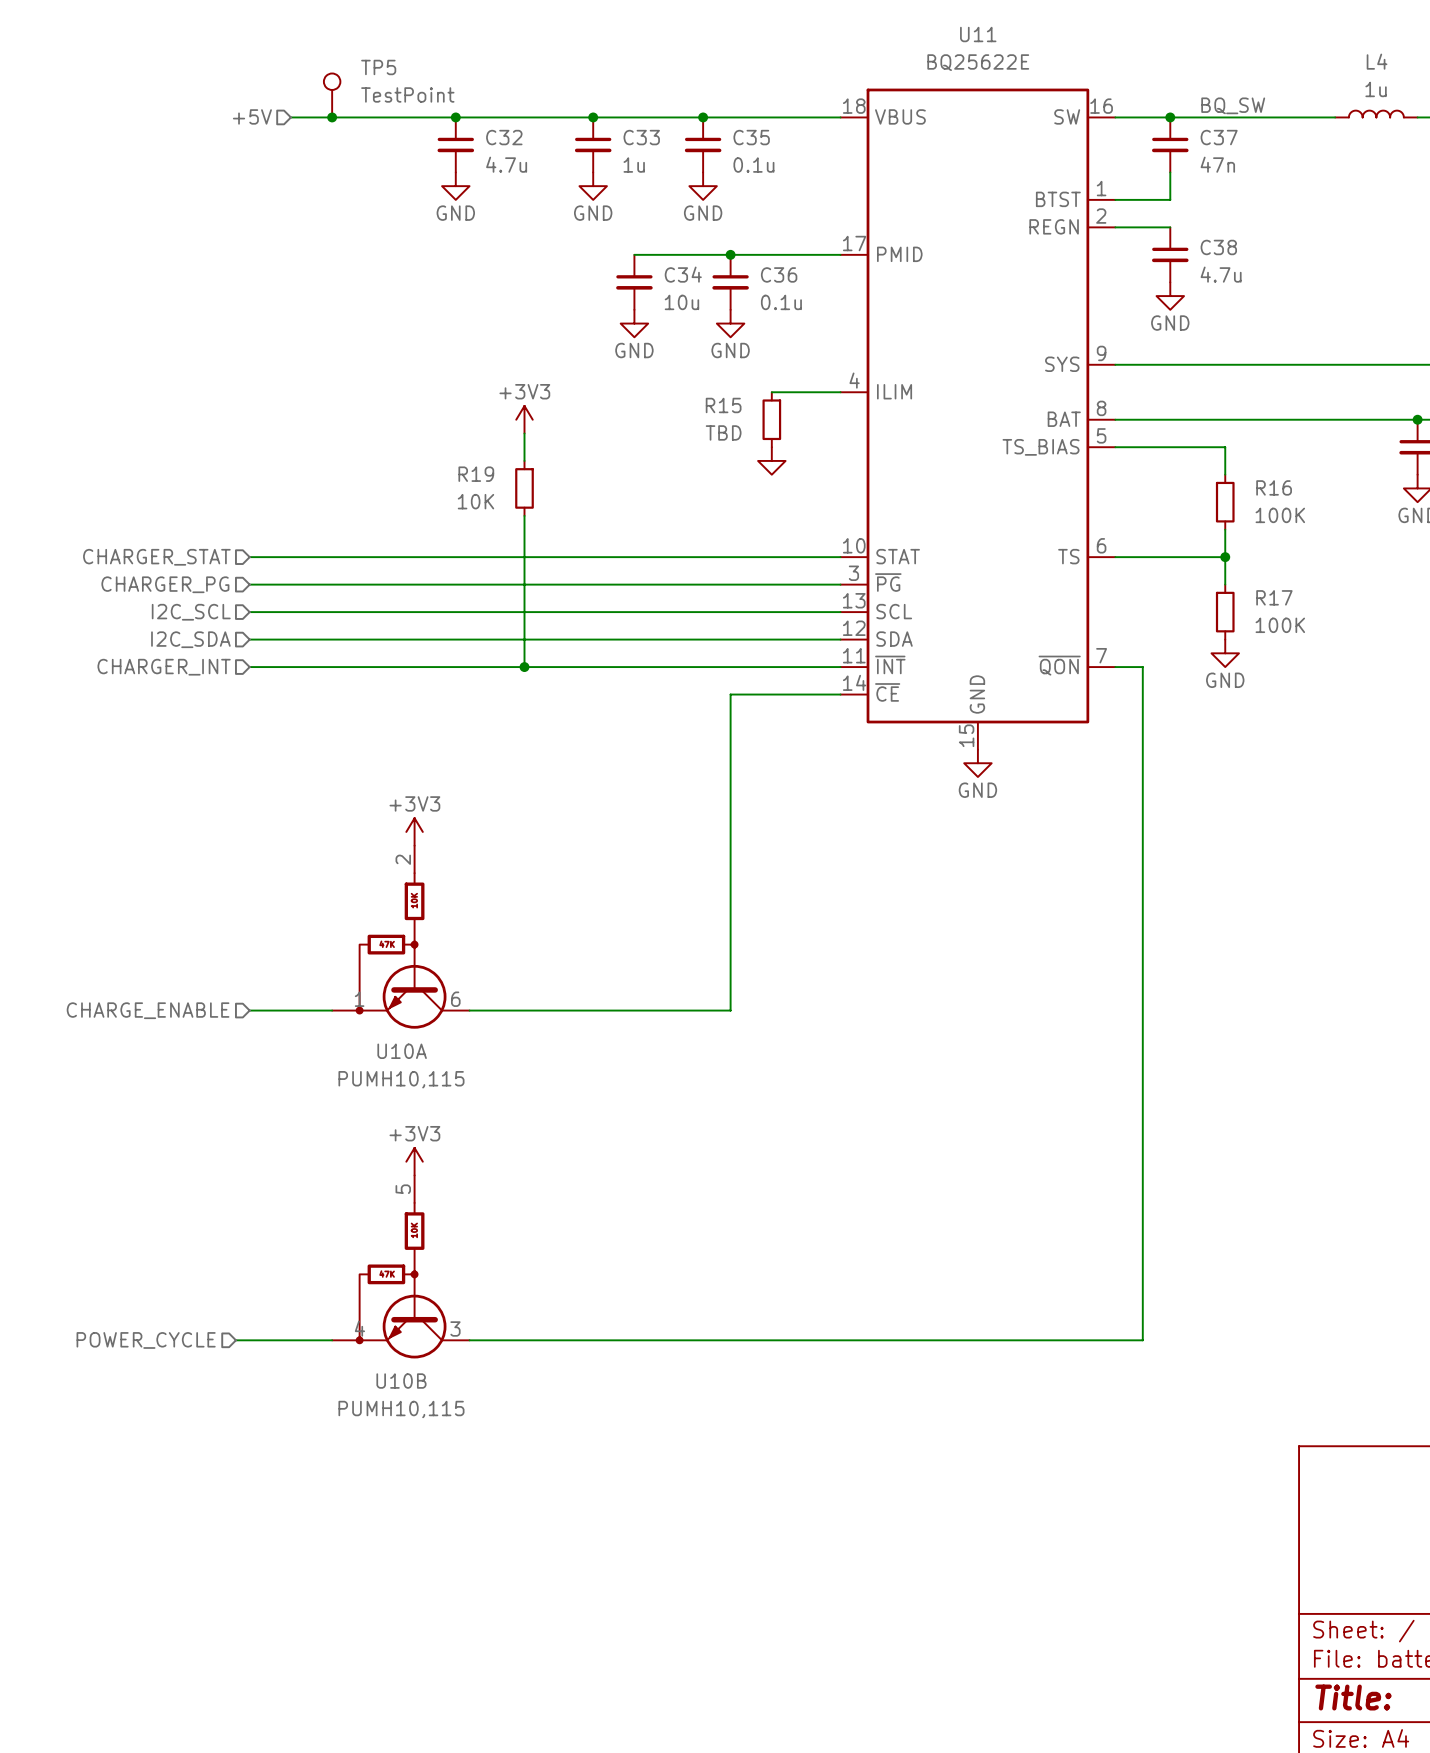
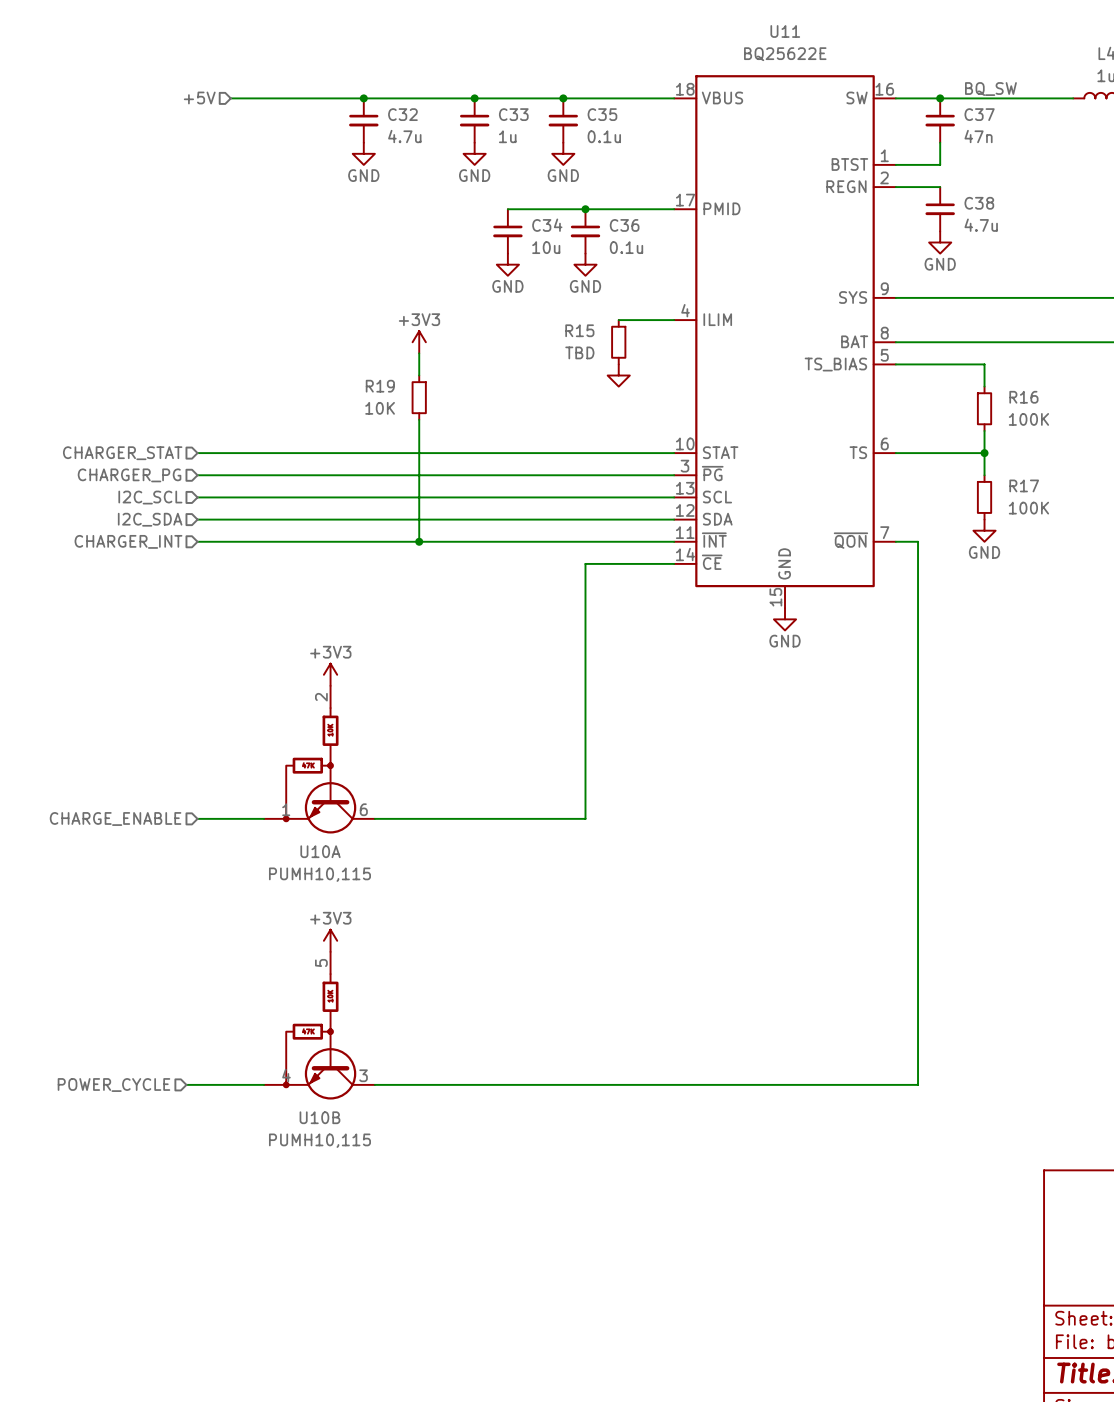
TP5: TestPoint (332, 95) -> none
junction: (332, 117) -> none

